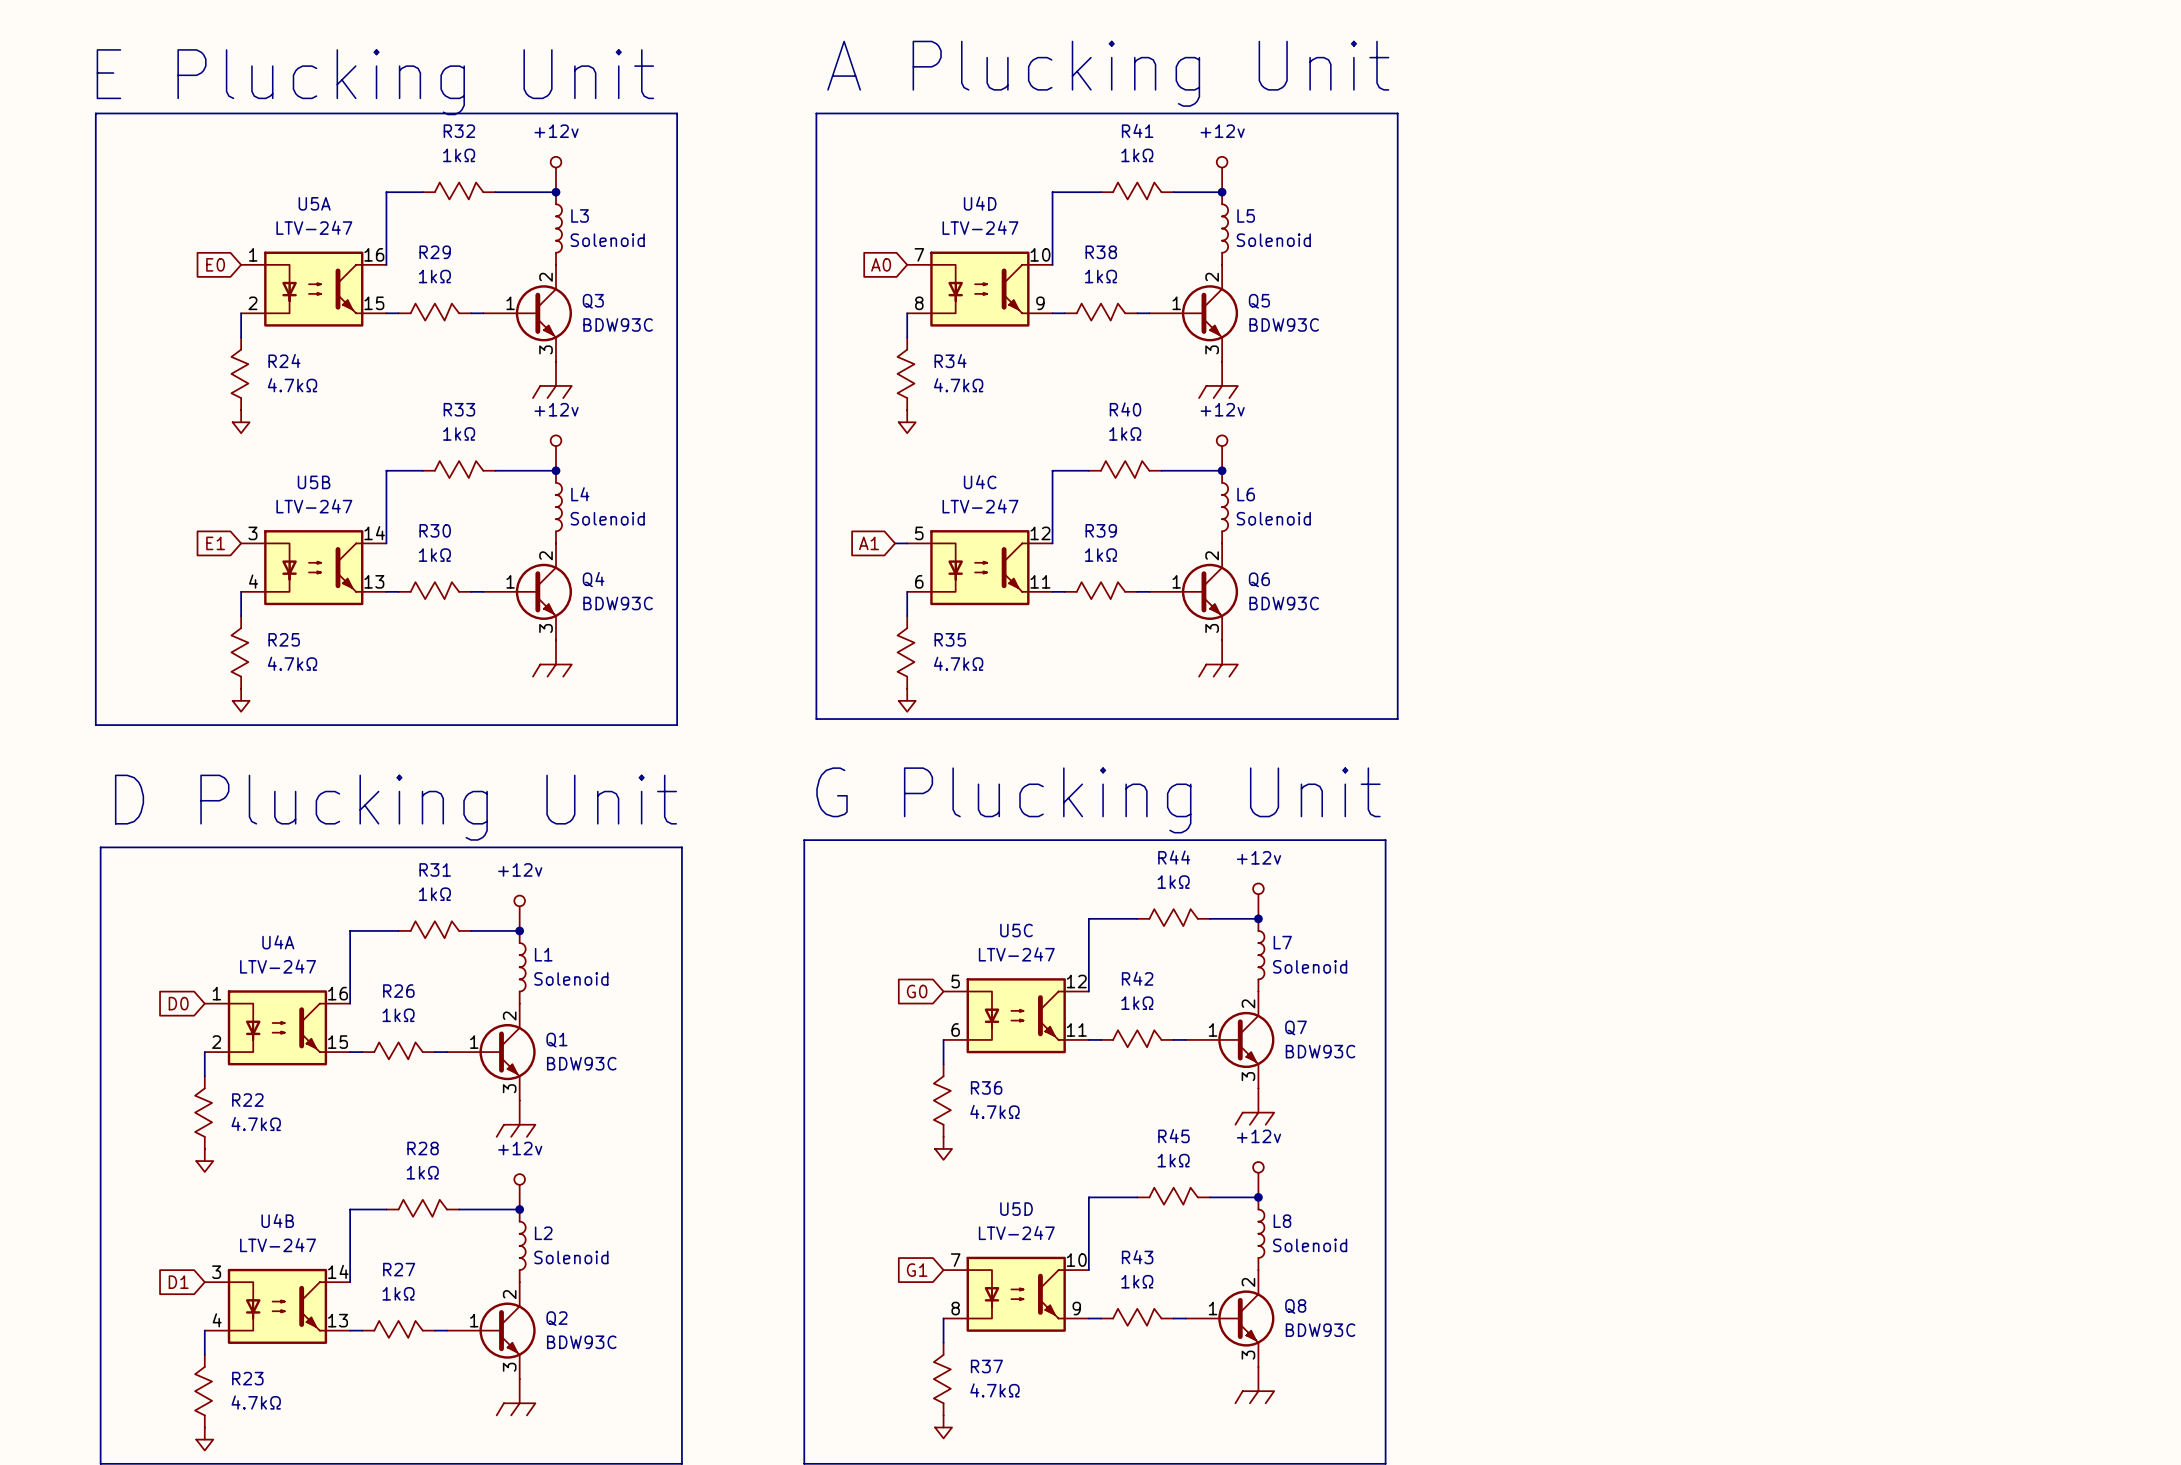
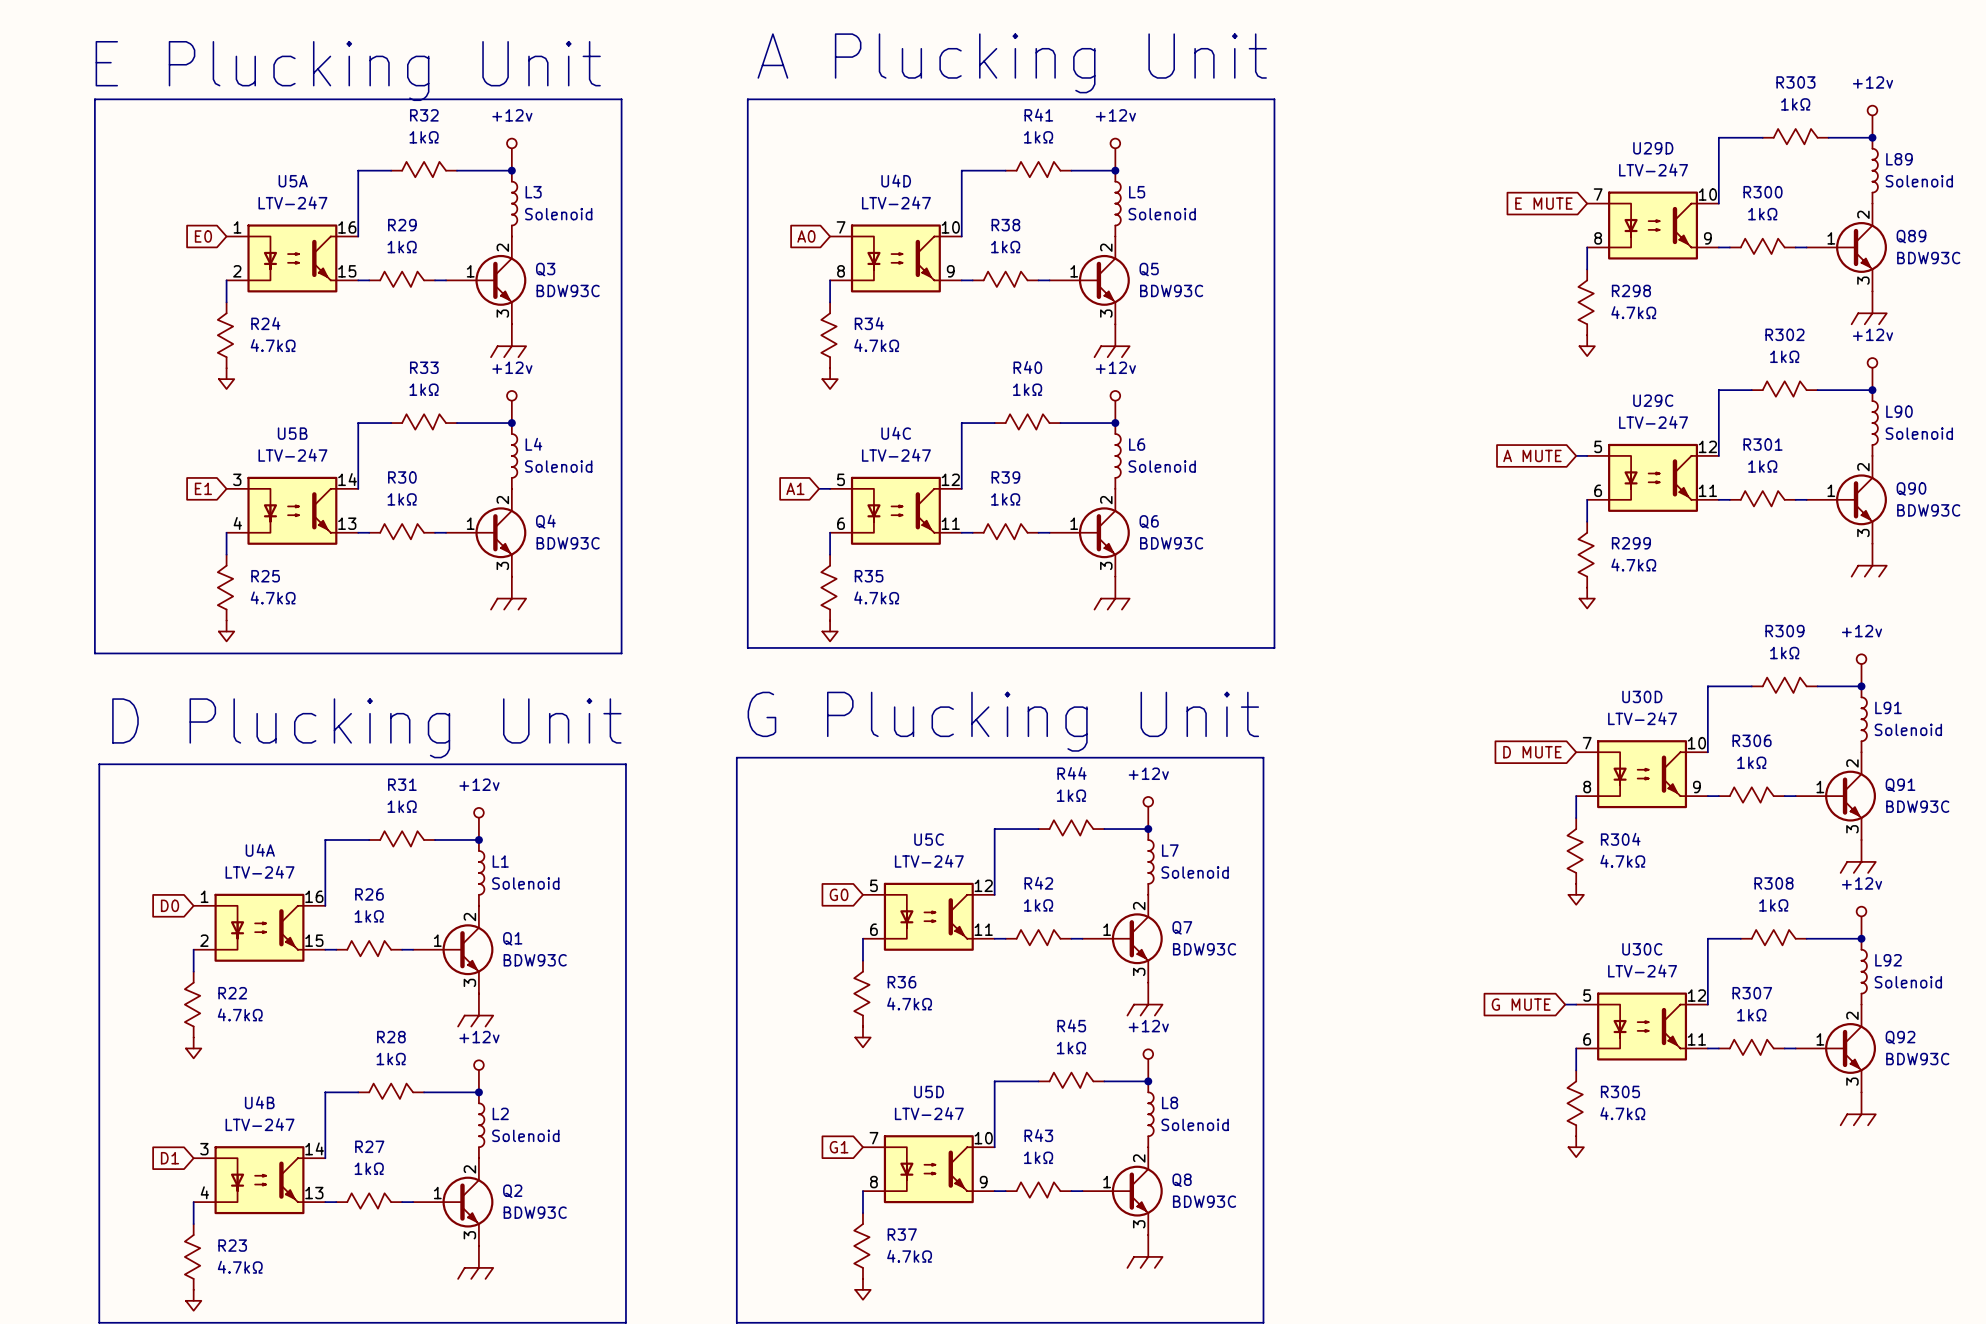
power symbol: none -> +12v (1872, 121)
R303: none -> 1kΩ (1795, 136)
wire: none -> (1762, 137) (1718, 137) (1718, 203)
wire: none -> (1828, 137) (1872, 137)
junction: none -> (1872, 137)
L89: none -> Solenoid (1875, 170)
global label: none -> E MUTE (1543, 203)
U29D: none -> LTV-247 (1653, 225)
R300: none -> 1kΩ (1762, 246)
wire: none -> (1587, 247) (1587, 269)
wire: none -> (1718, 247) (1729, 247)
wire: none -> (1795, 247) (1806, 247)
Q89: none -> BDW93C (1846, 247)
R298: none -> 4.7kΩ (1586, 302)
power symbol: none -> (1869, 307)
power symbol: none -> (1587, 345)
power symbol: none -> +12v (1872, 374)
R302: none -> 1kΩ (1784, 389)
wire: none -> (1751, 390) (1718, 390) (1718, 455)
wire: none -> (1817, 390) (1872, 390)
junction: none -> (1872, 390)
L90: none -> Solenoid (1875, 423)
global label: none -> A MUTE (1532, 455)
wire: none -> (1576, 455) (1587, 455)
U29C: none -> LTV-247 (1653, 477)
R301: none -> 1kΩ (1762, 498)
wire: none -> (1587, 499) (1587, 521)
wire: none -> (1718, 499) (1729, 499)
wire: none -> (1795, 499) (1806, 499)
Q90: none -> BDW93C (1846, 499)
R299: none -> 4.7kΩ (1586, 554)
power symbol: none -> (1869, 560)
power symbol: none -> (1587, 598)
power symbol: none -> +12v (1861, 670)
R309: none -> 1kΩ (1784, 685)
wire: none -> (1751, 686) (1707, 686) (1707, 752)
wire: none -> (1817, 686) (1861, 686)
junction: none -> (1861, 686)
L91: none -> Solenoid (1864, 719)
global label: none -> D MUTE (1532, 752)
U30D: none -> LTV-247 (1642, 774)
R306: none -> 1kΩ (1751, 795)
wire: none -> (1576, 796) (1576, 818)
wire: none -> (1707, 796) (1718, 796)
wire: none -> (1784, 796) (1795, 796)
Q91: none -> BDW93C (1835, 796)
R304: none -> 4.7kΩ (1575, 850)
power symbol: none -> (1858, 856)
power symbol: none -> (1576, 894)
power symbol: none -> +12v (1861, 922)
R308: none -> 1kΩ (1773, 937)
wire: none -> (1740, 938) (1707, 938) (1707, 1004)
wire: none -> (1806, 938) (1861, 938)
junction: none -> (1861, 938)
L92: none -> Solenoid (1864, 971)
global label: none -> G MUTE (1521, 1004)
wire: none -> (1565, 1004) (1576, 1004)
U30C: none -> LTV-247 (1642, 1026)
R307: none -> 1kΩ (1751, 1047)
wire: none -> (1576, 1048) (1576, 1070)
wire: none -> (1707, 1048) (1718, 1048)
wire: none -> (1784, 1048) (1795, 1048)
Q92: none -> BDW93C (1835, 1048)
R305: none -> 4.7kΩ (1575, 1103)
power symbol: none -> (1858, 1108)
power symbol: none -> (1576, 1146)

